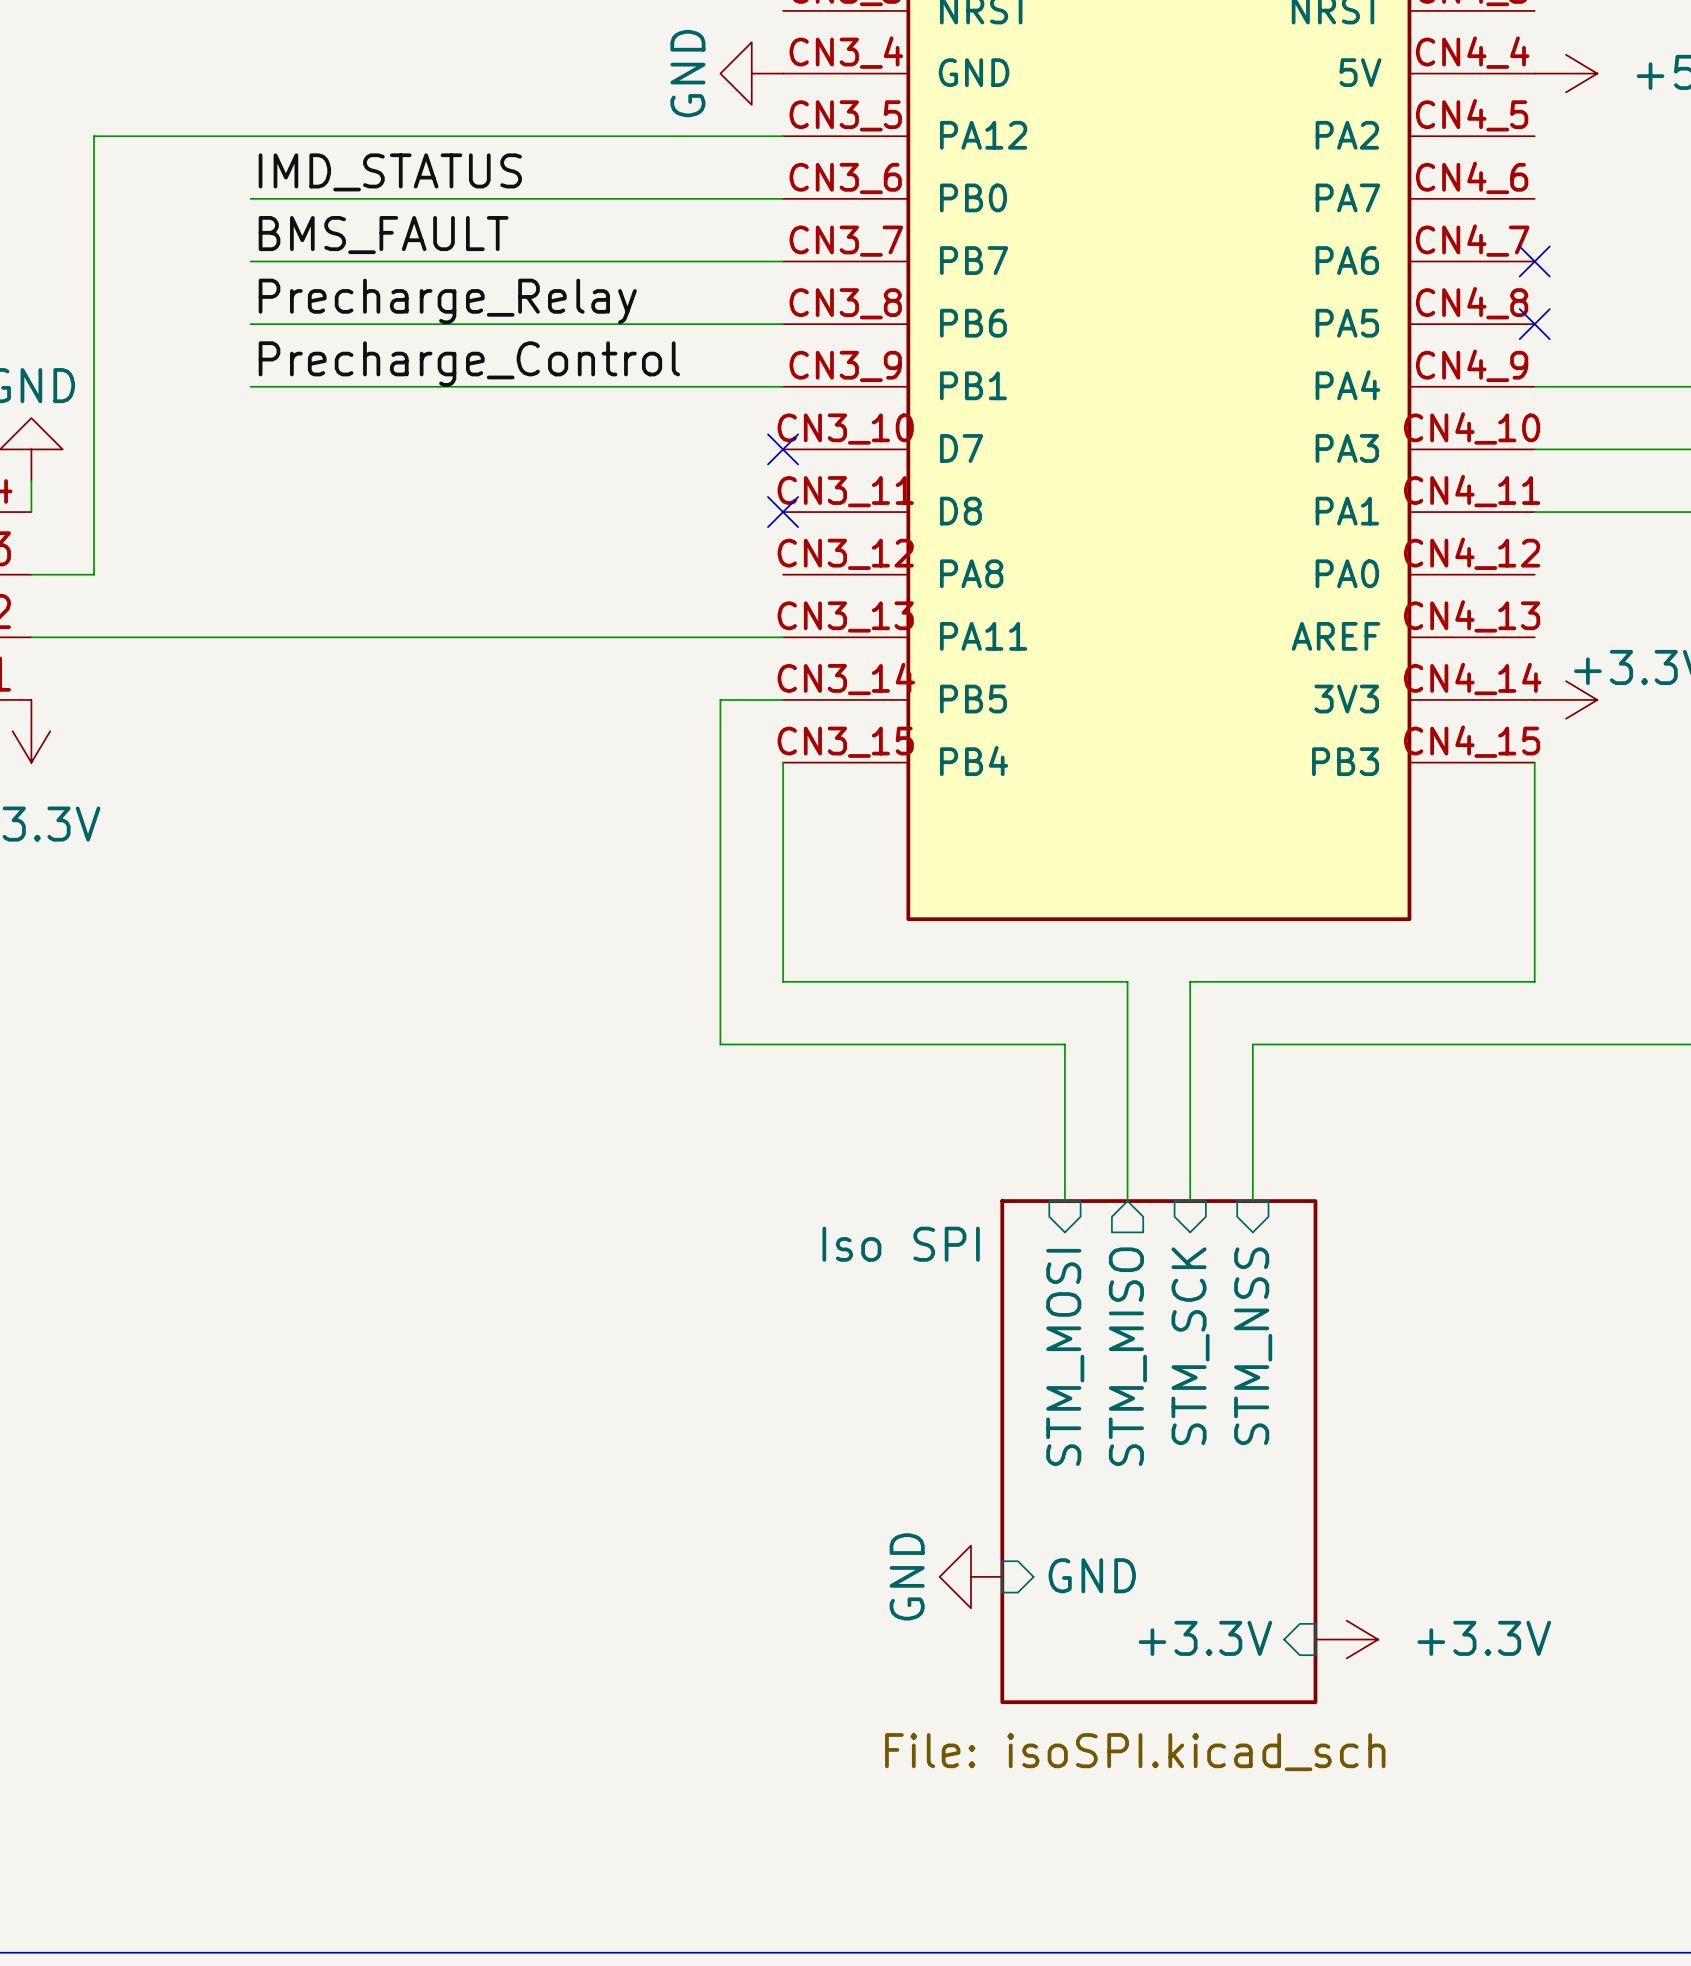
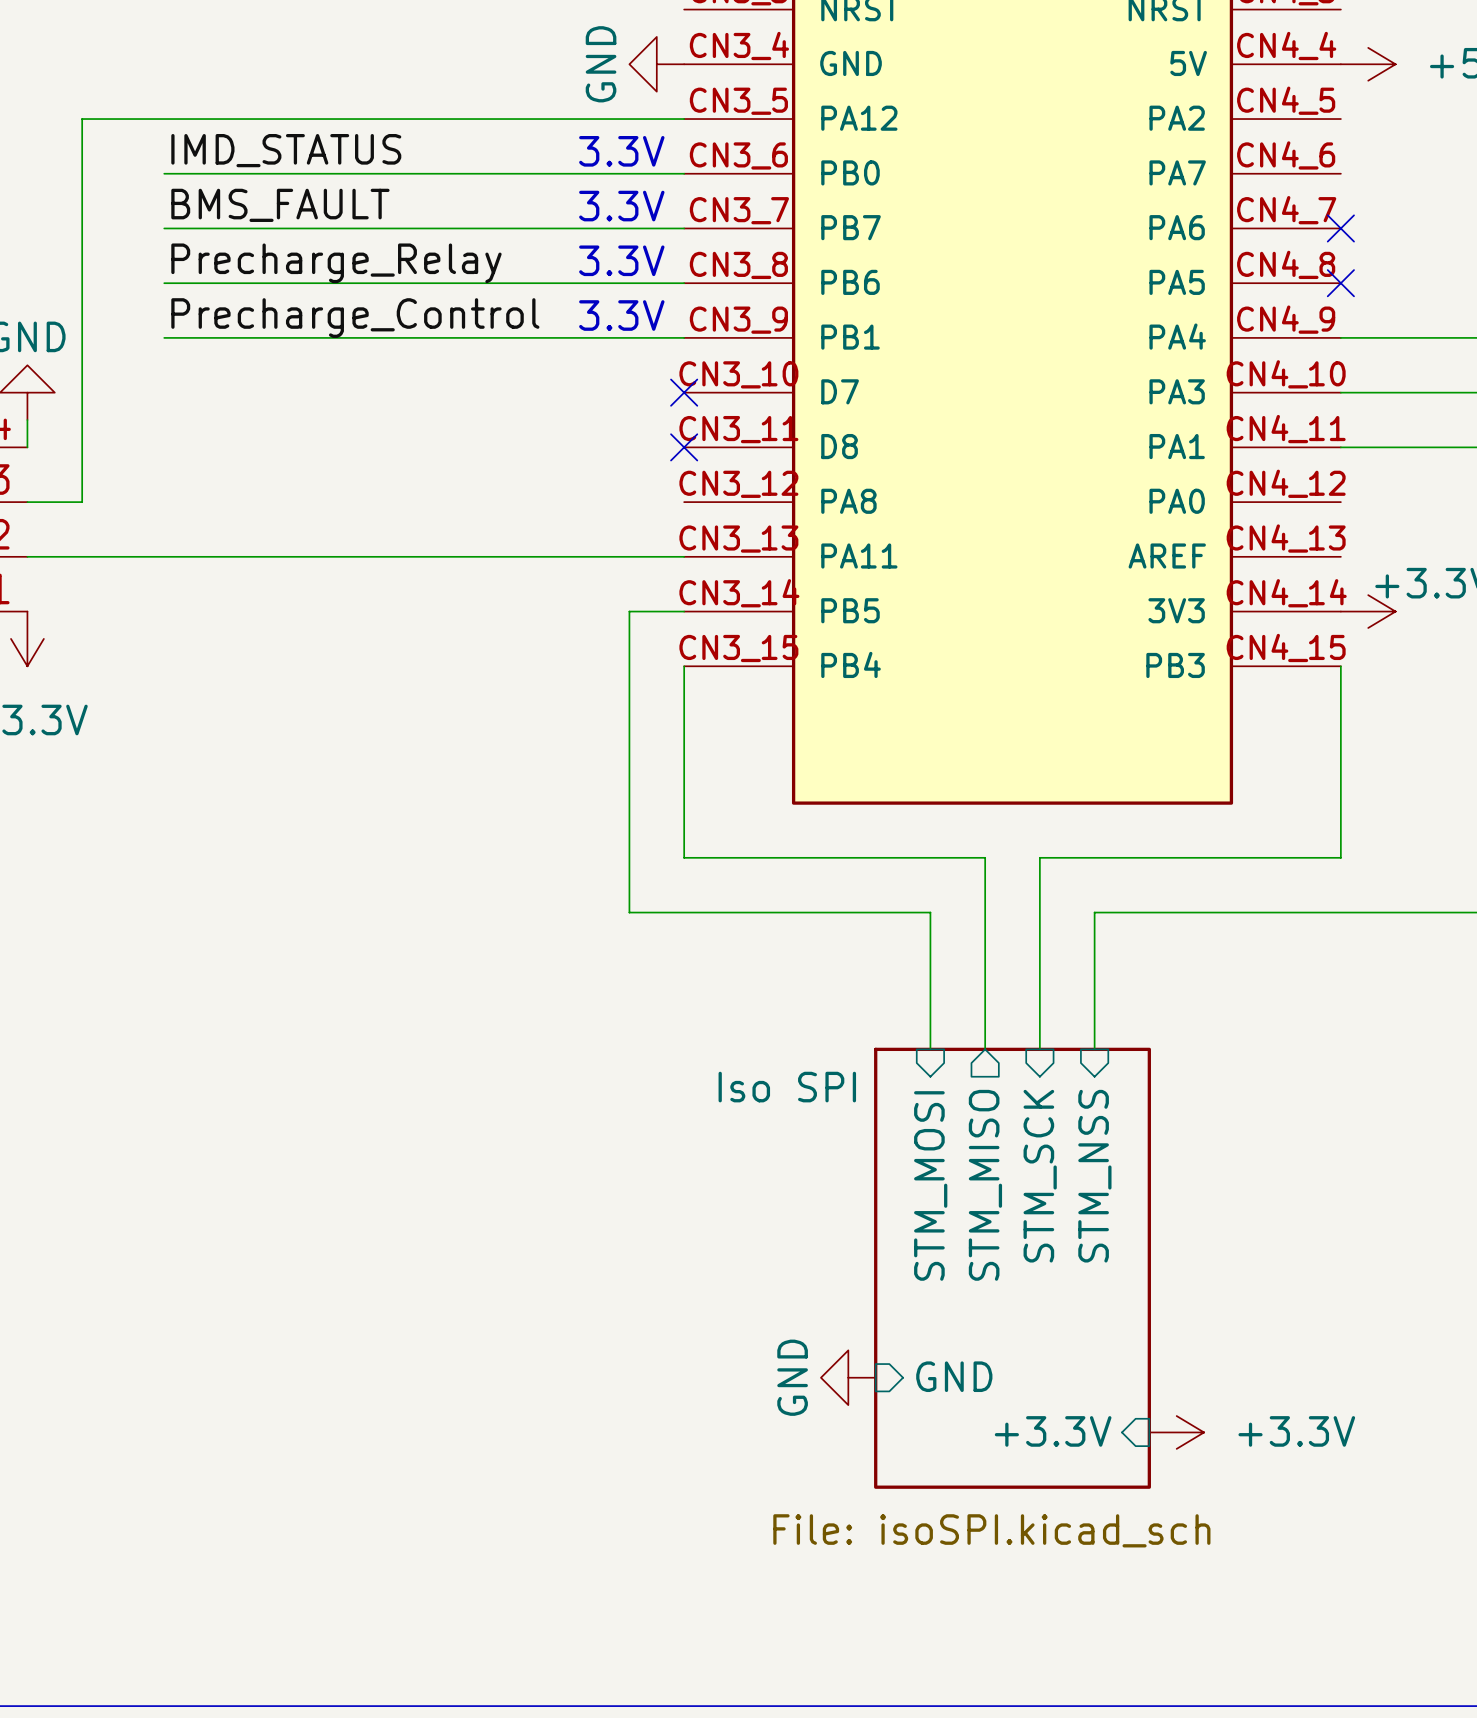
label position: IMD_STATUS (390, 172) -> IMD_STATUS (286, 150)
text: none -> 3.3V (621, 151)
wire: none -> (164, 173) (218, 173)
label position: BMS_FAULT (383, 235) -> BMS_FAULT (280, 205)
text: none -> 3.3V (621, 206)
wire: none -> (164, 228) (218, 228)
text: none -> 3.3V (621, 260)
label position: Precharge_Relay (447, 301) -> Precharge_Relay (336, 263)
wire: none -> (164, 283) (218, 283)
text: none -> 3.3V (621, 315)
label position: Precharge_Control (469, 364) -> Precharge_Control (355, 318)
wire: none -> (164, 337) (218, 337)

